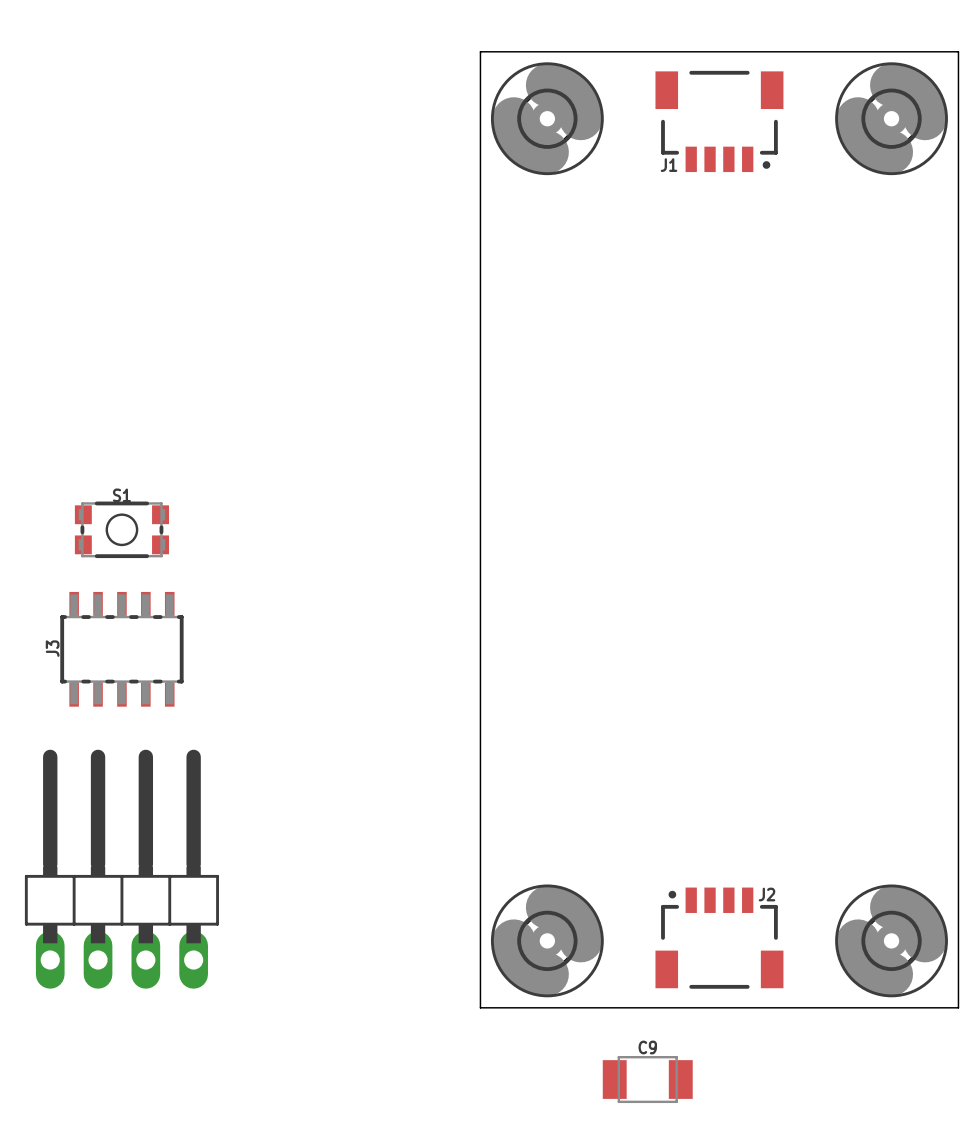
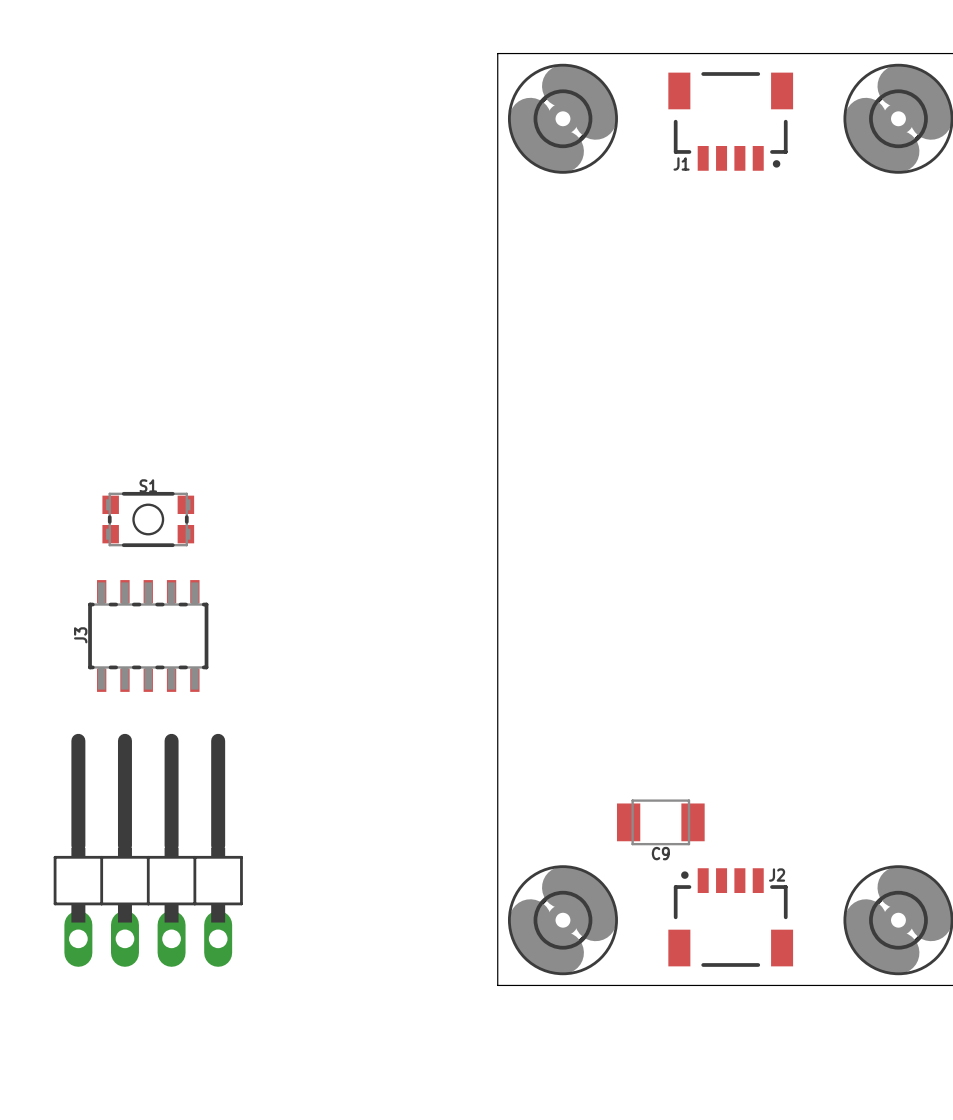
C9 name position: C9 (647, 1047) -> C9 (660, 853)
C9 position: (647, 1079) -> (660, 822)

